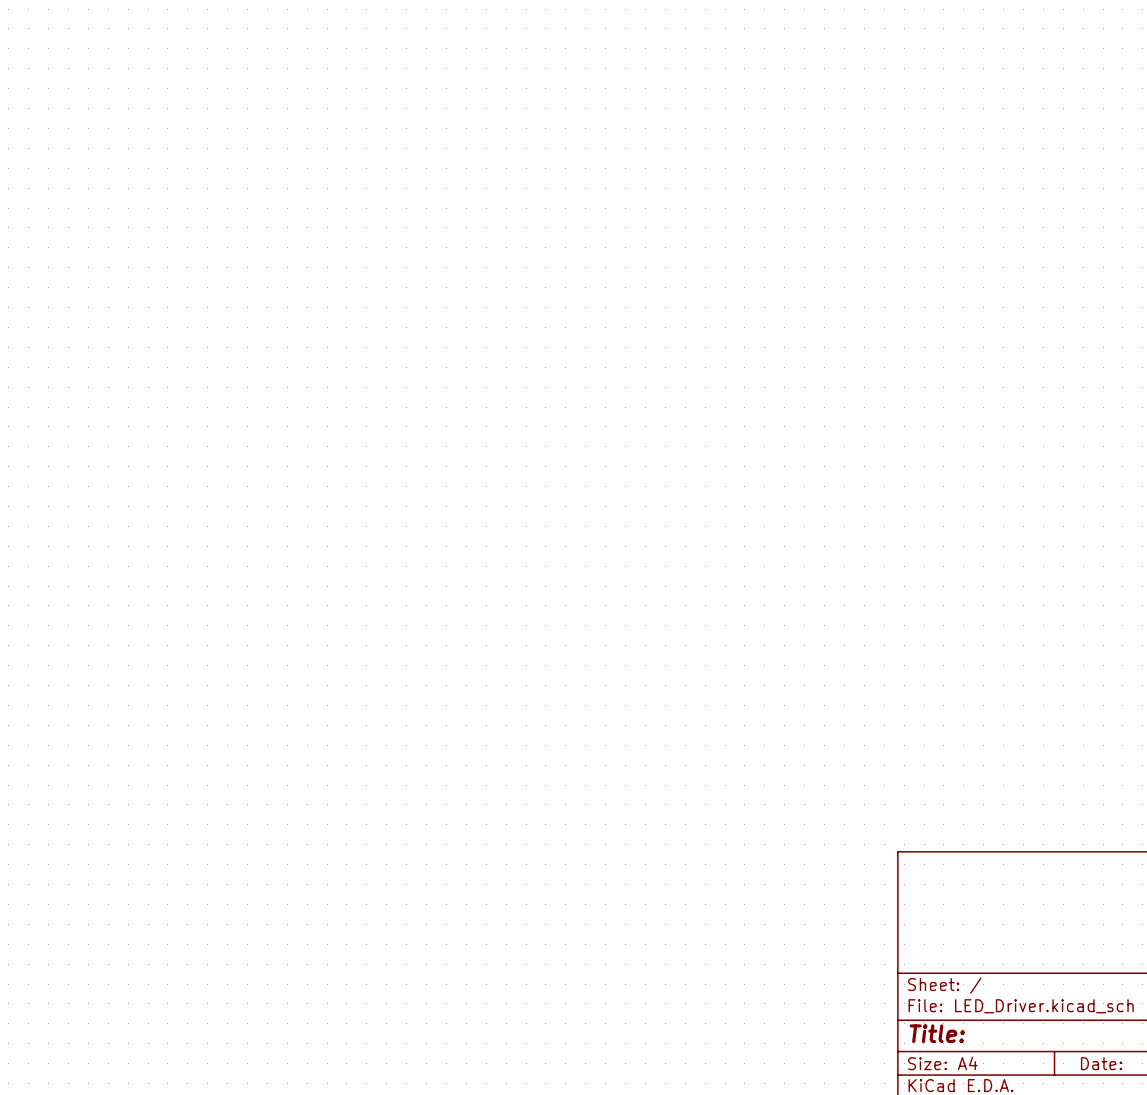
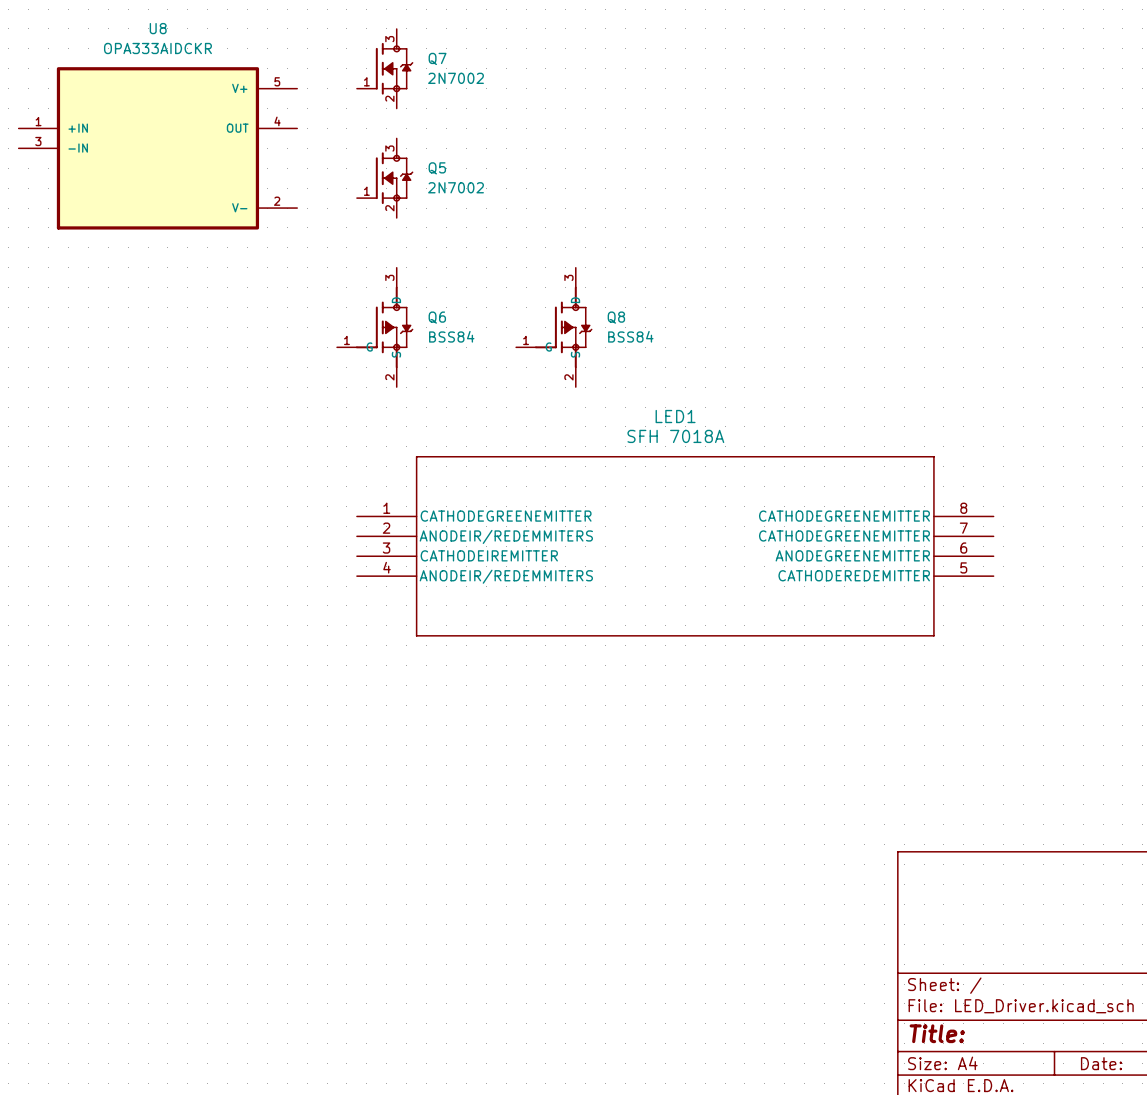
Q7: none -> 2N7002 (385, 68)
U8: none -> OPA333AIDCKR (157, 148)
Q5: none -> 2N7002 (385, 178)
Q6: none -> BSS84 (375, 327)
Q8: none -> BSS84 (554, 327)
LED1: none -> SFH 7018A (675, 546)

